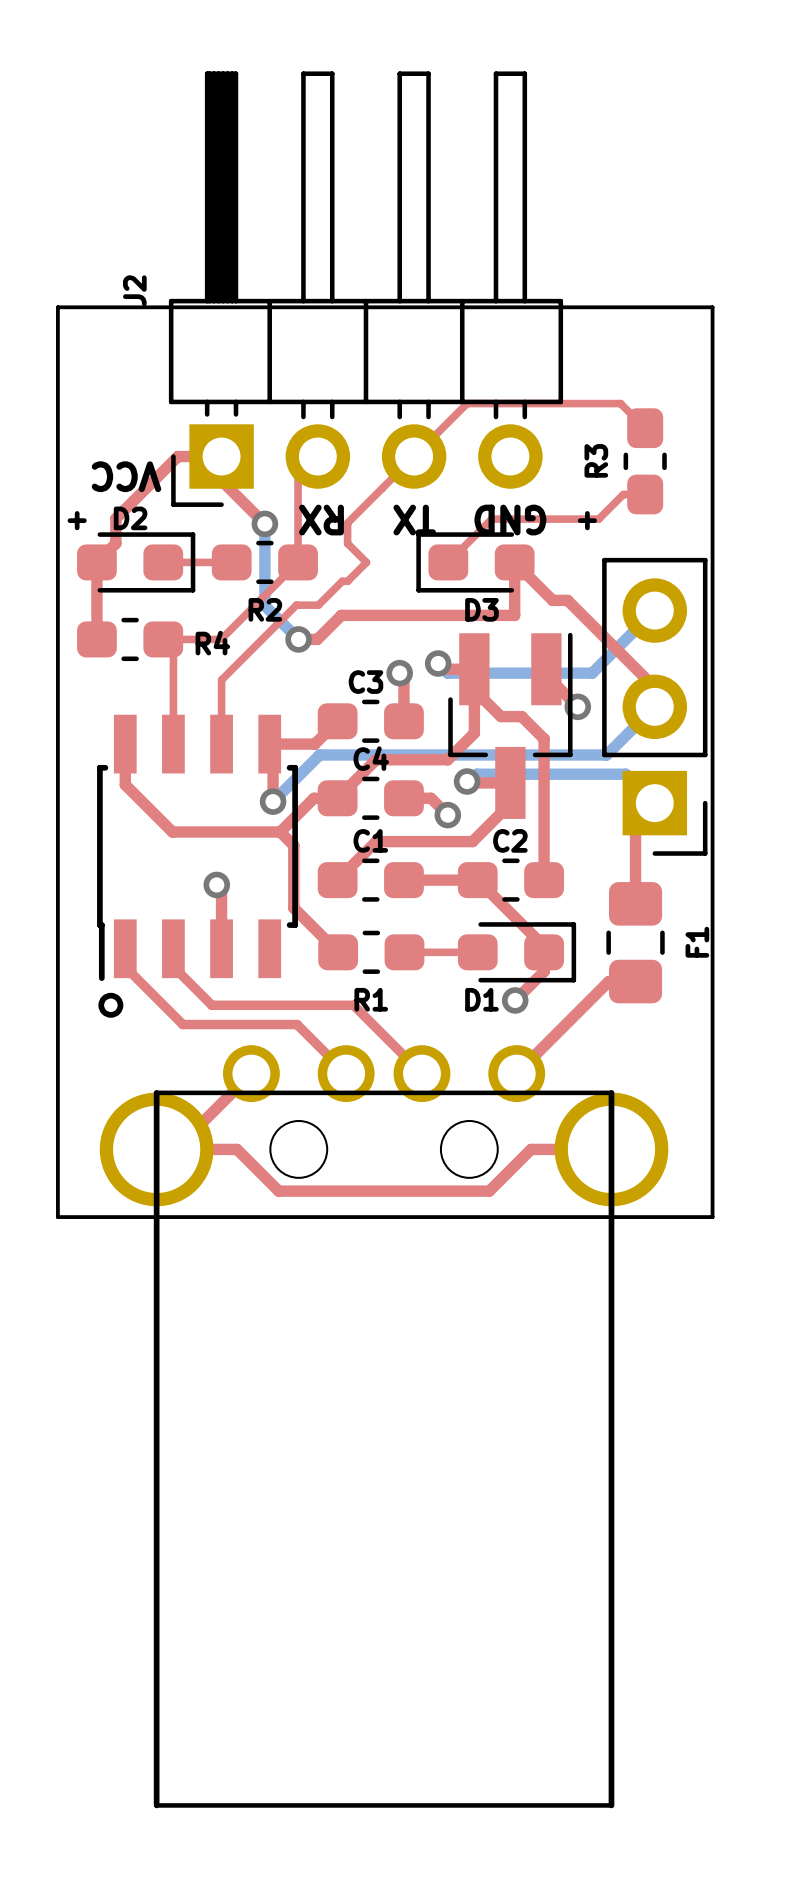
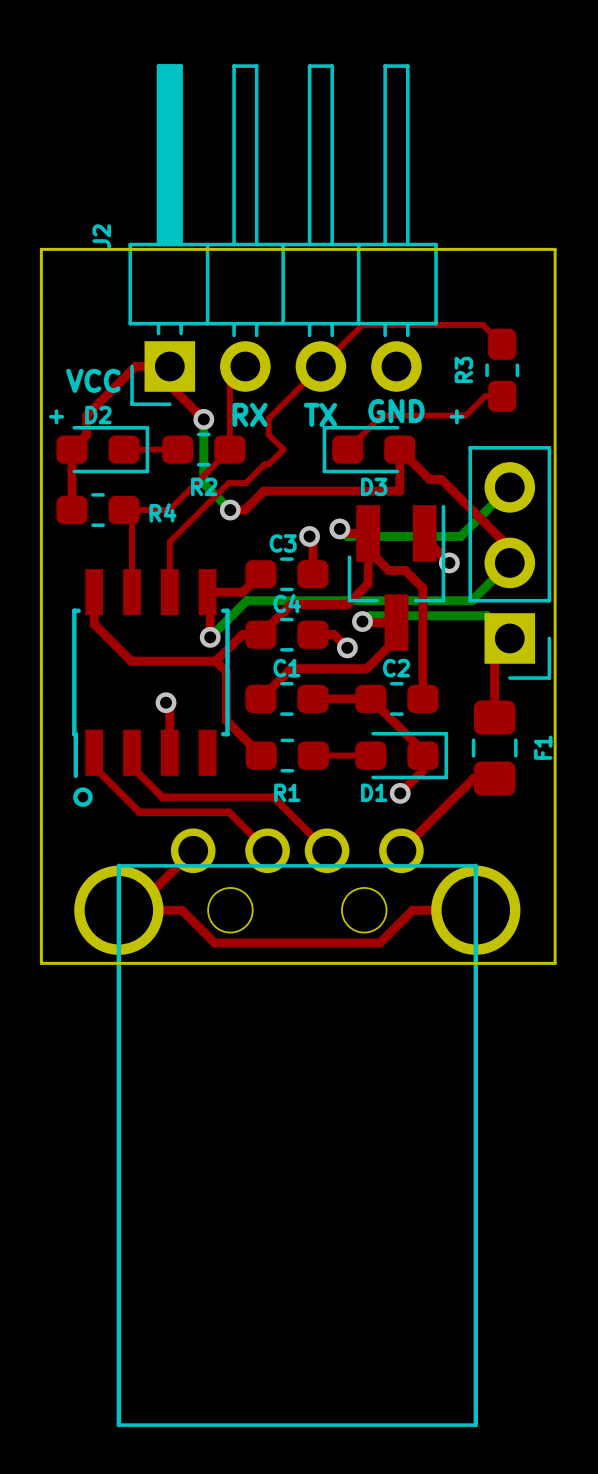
text rotation: 0° (126, 476) -> 180° (93, 380)
text rotation: 0° (321, 520) -> 180° (250, 414)
text rotation: 0° (414, 520) -> 180° (320, 414)
text rotation: 0° (510, 520) -> 180° (396, 411)

